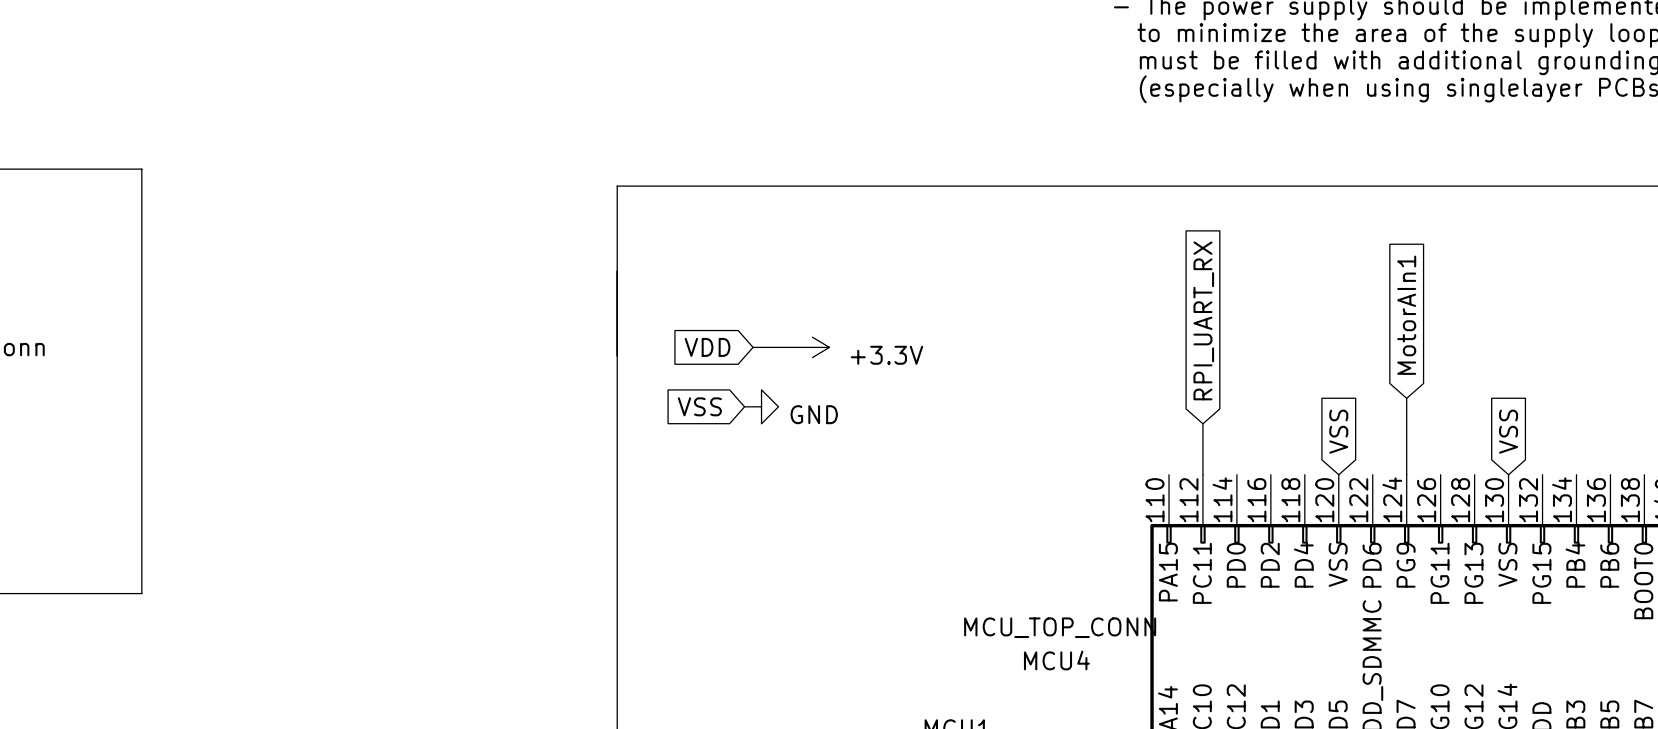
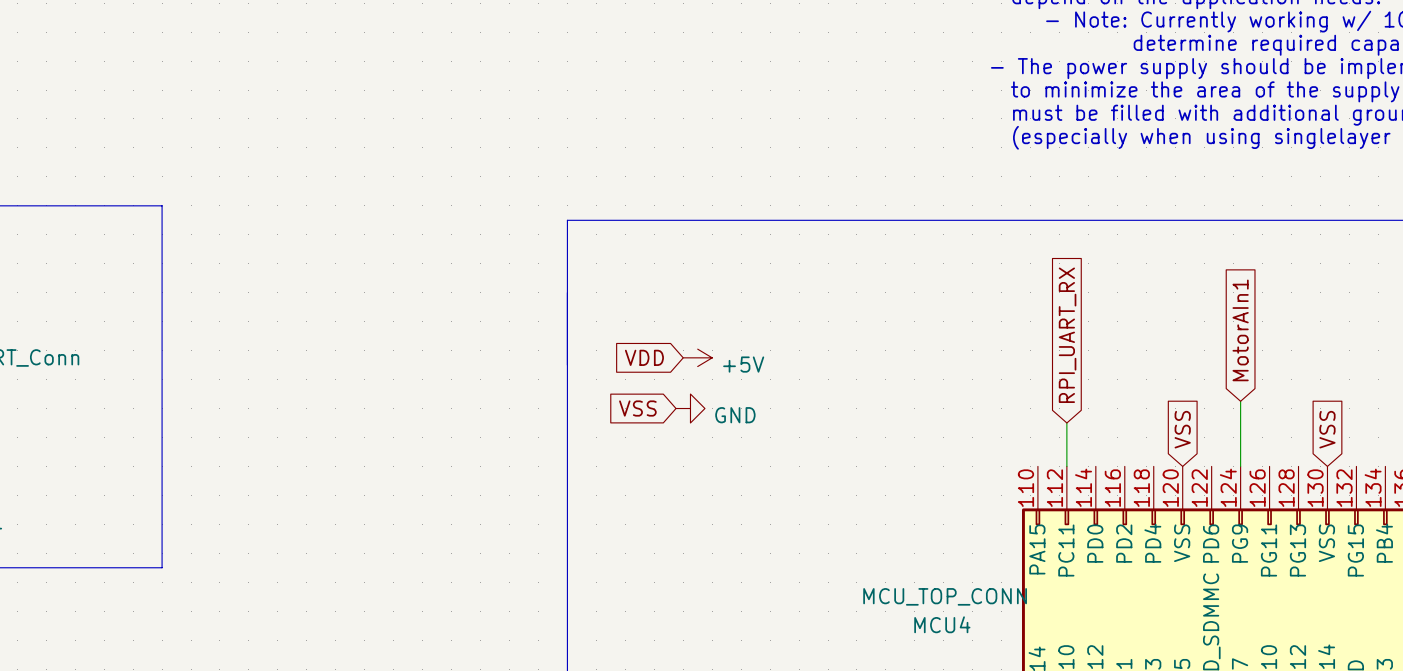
power symbol: none -> +5V (697, 357)
power symbol: +3.3V (812, 347) -> none

